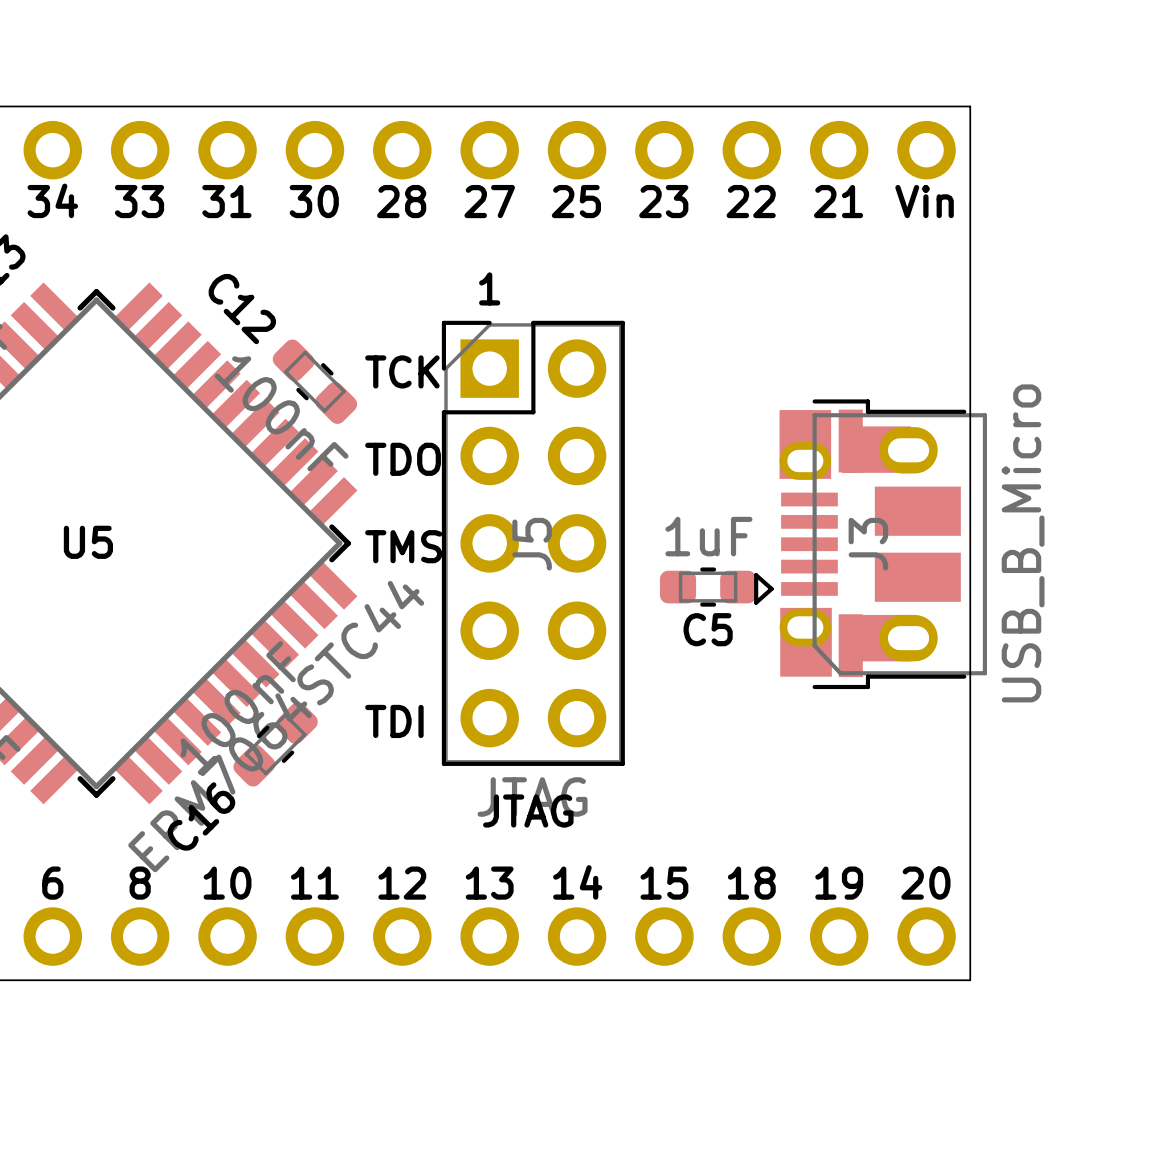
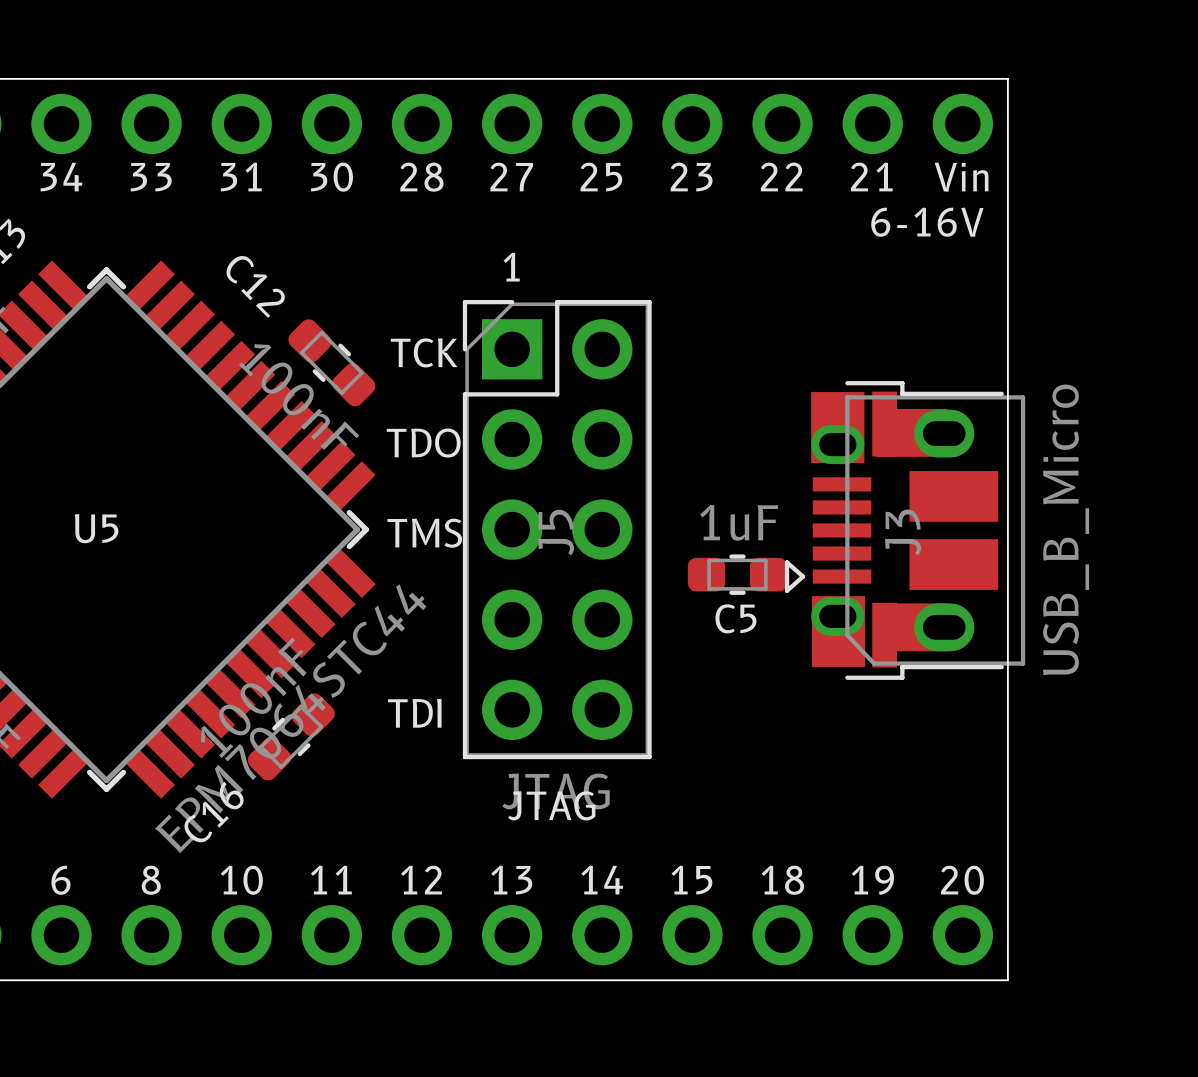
text: none -> 6-16V (927, 222)

